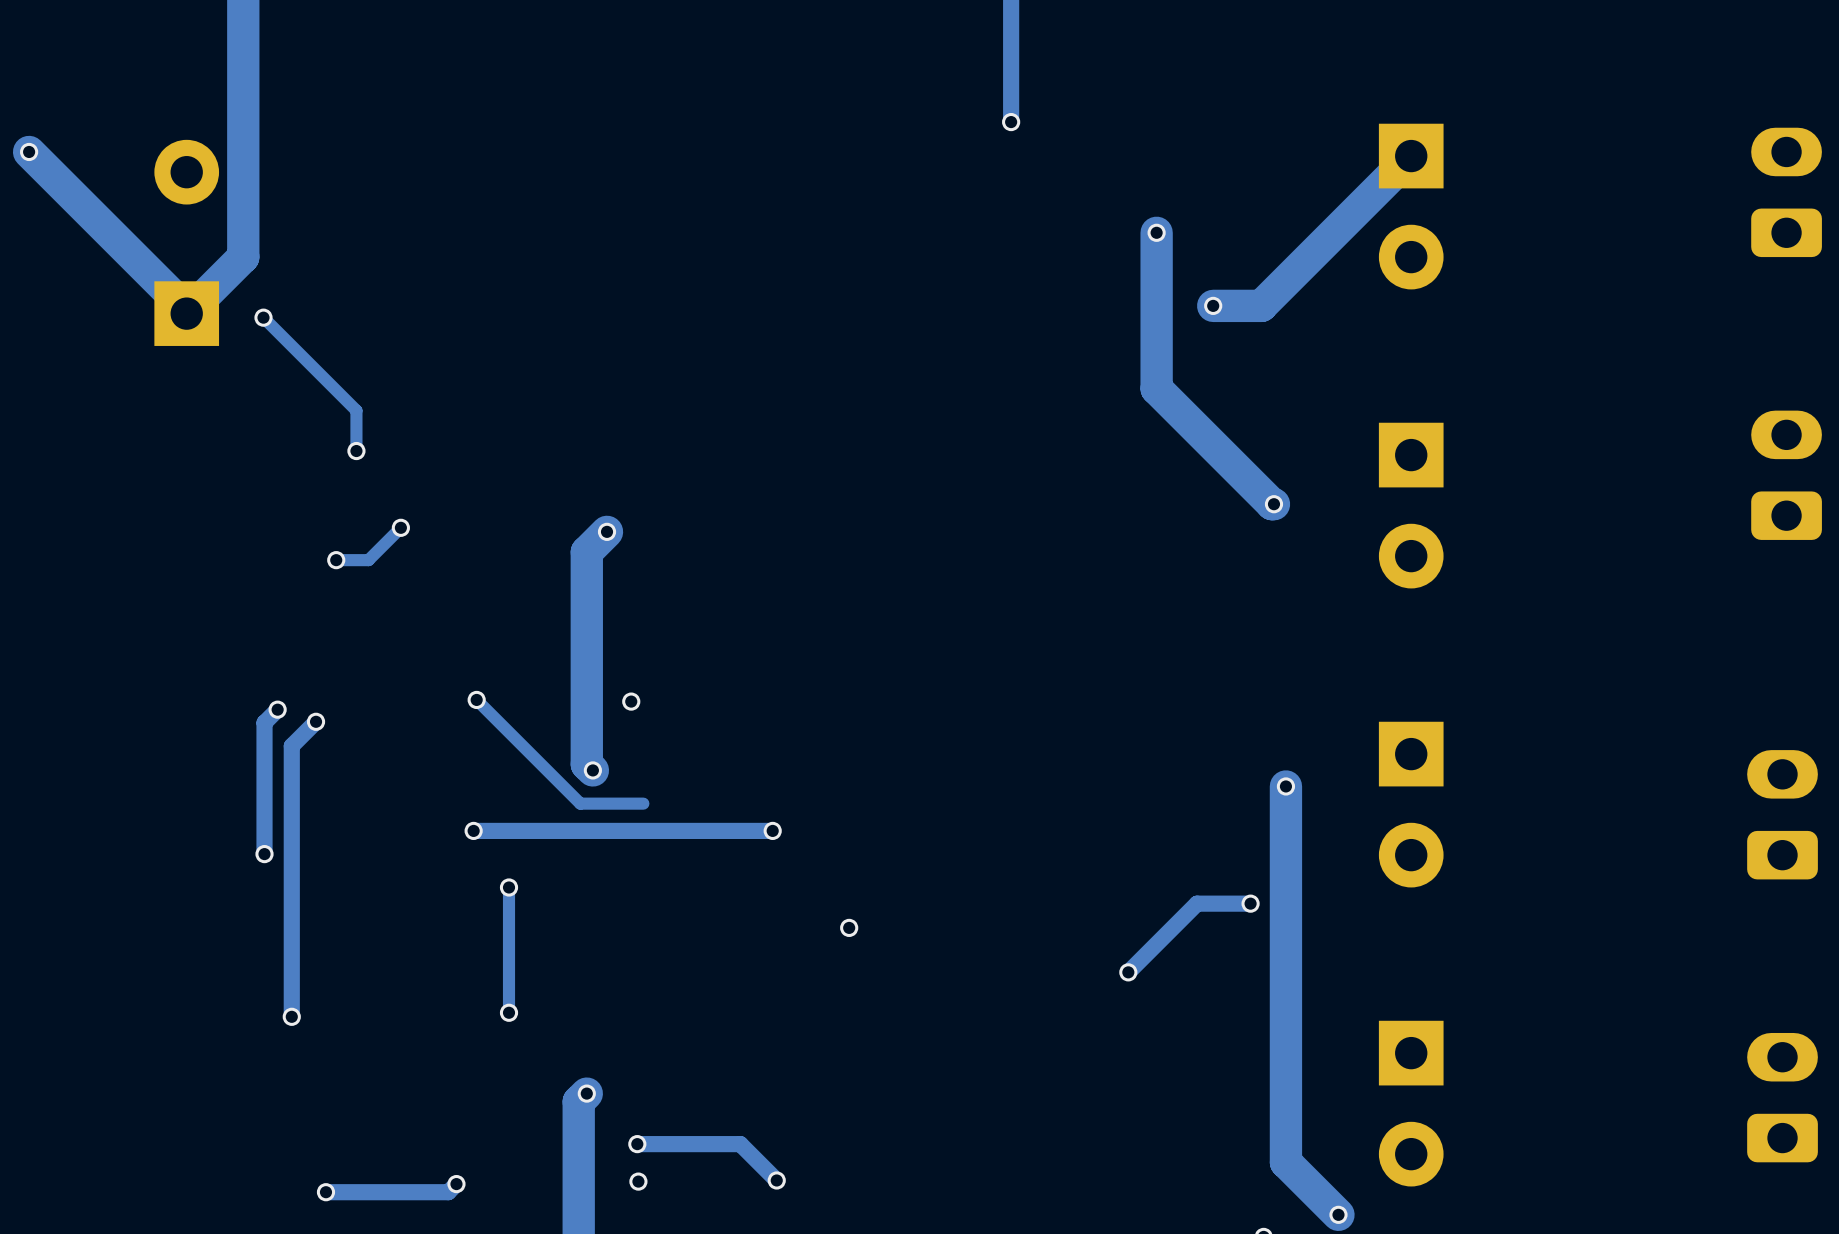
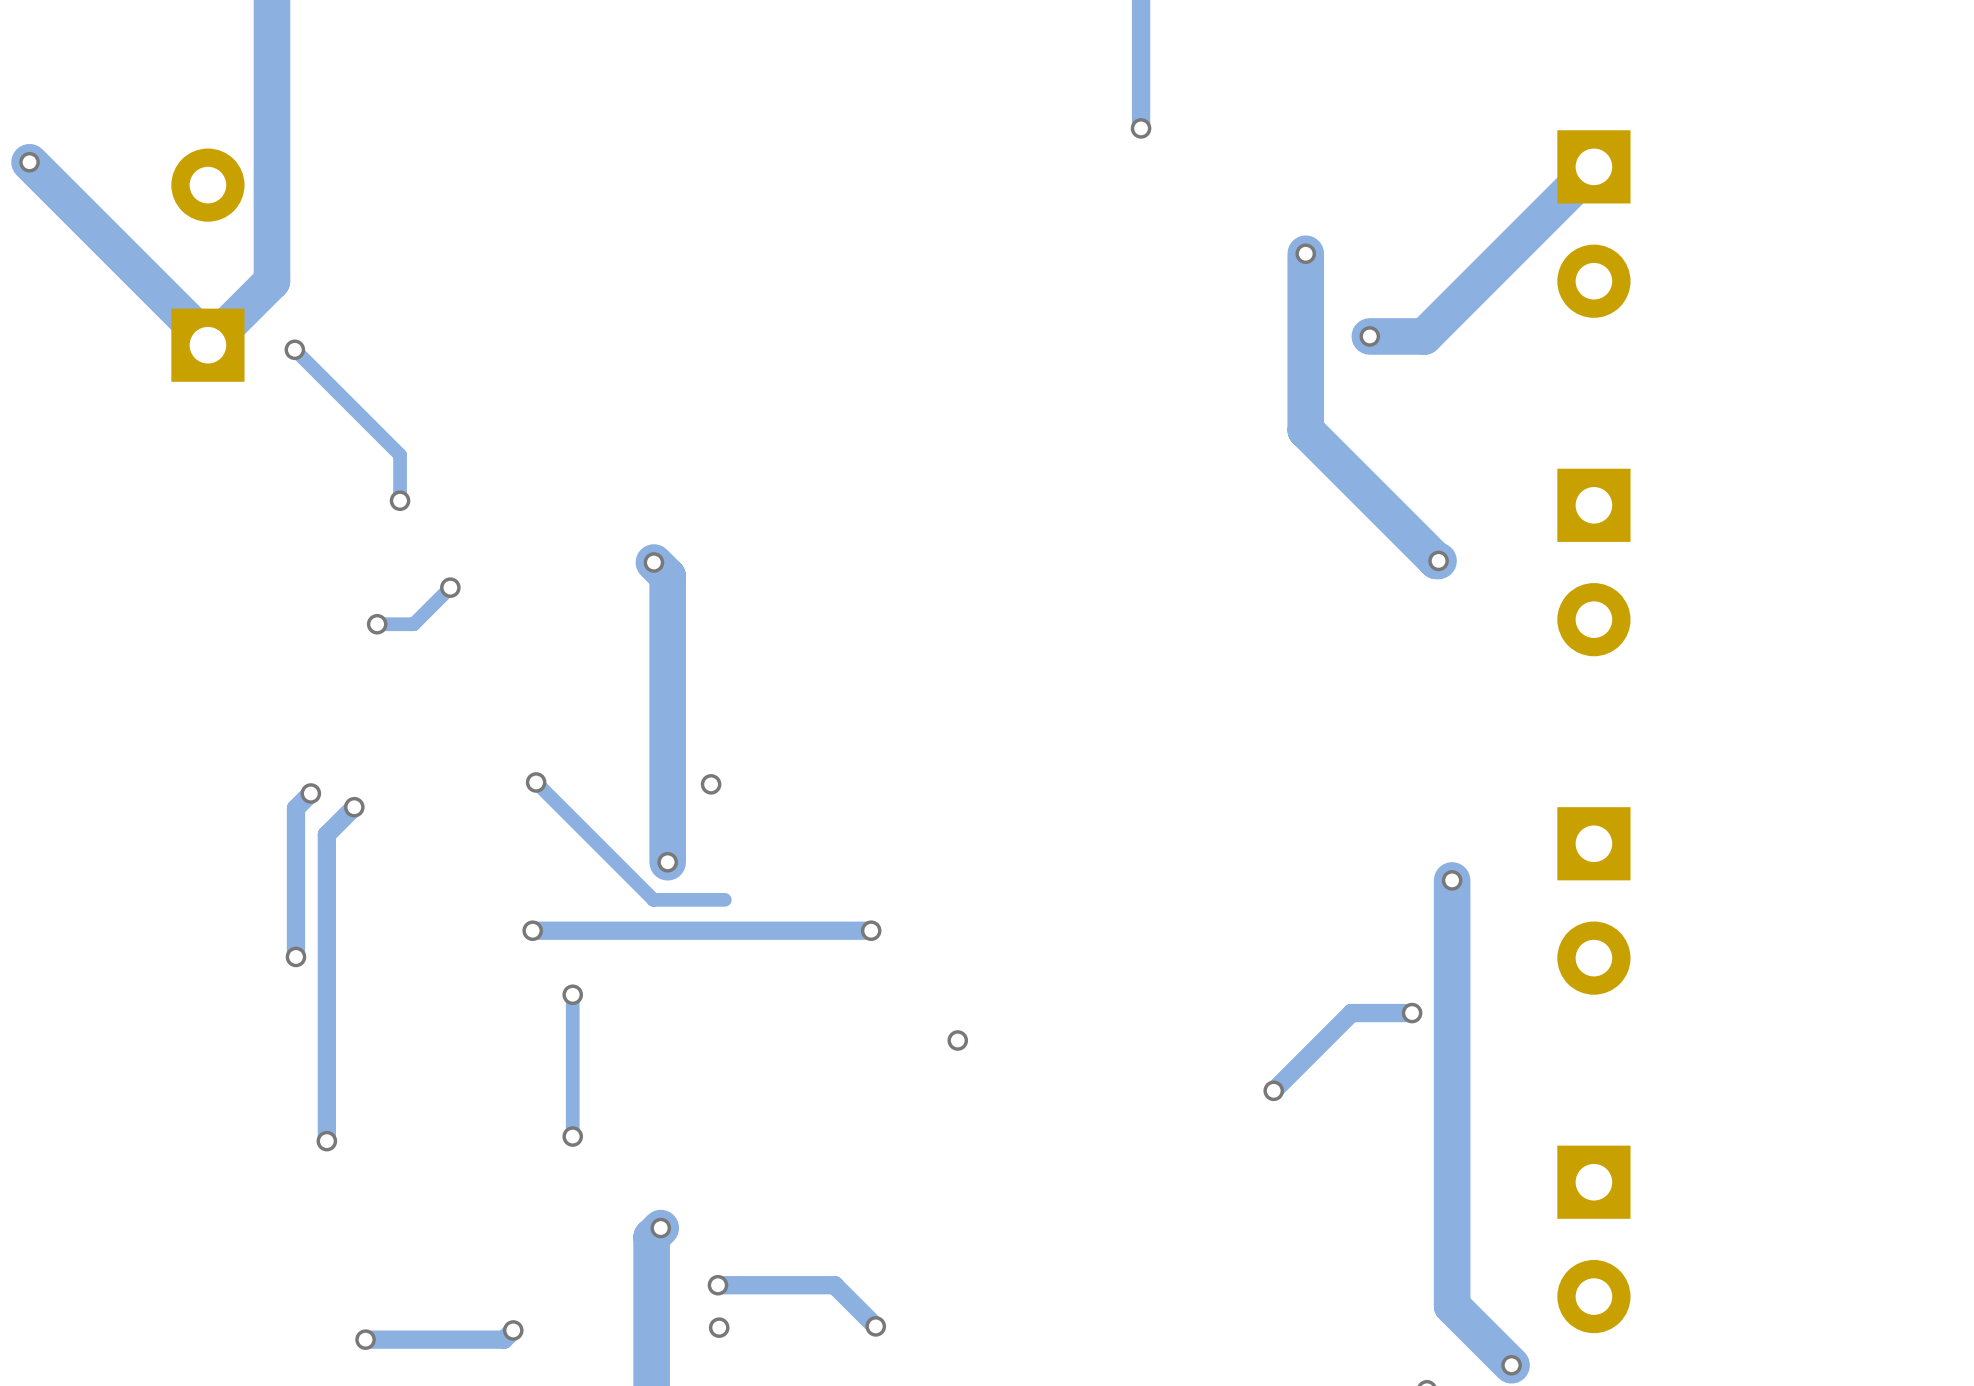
track: (607, 531) (586, 552) (586, 764) (592, 770) -> (653, 562) (667, 576) (667, 862)
via position: (607, 531) -> (653, 562)

